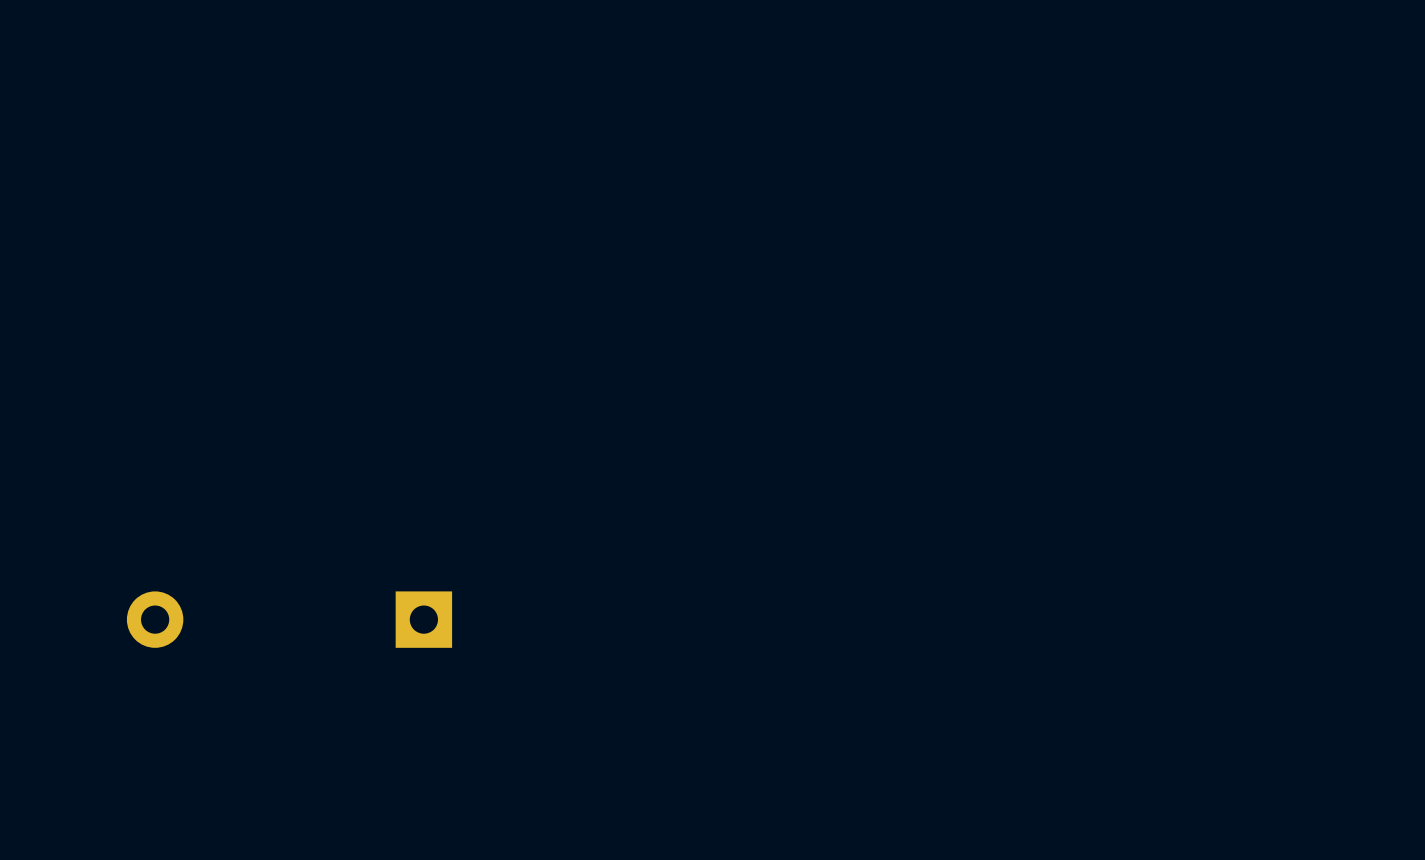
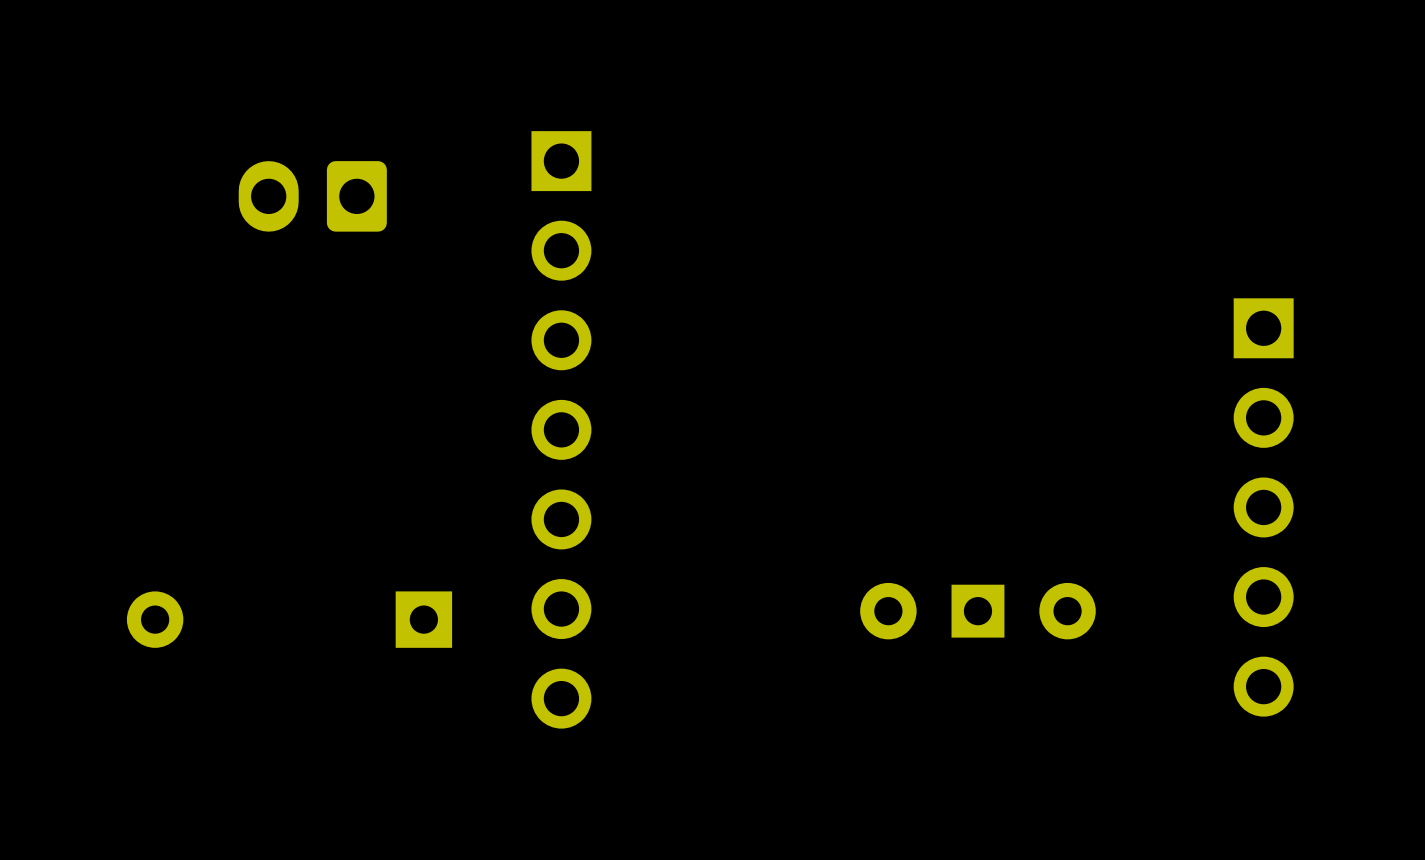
part: none -> (312, 196)
part: none -> (561, 429)
part: none -> (1263, 507)
part: none -> (977, 611)

